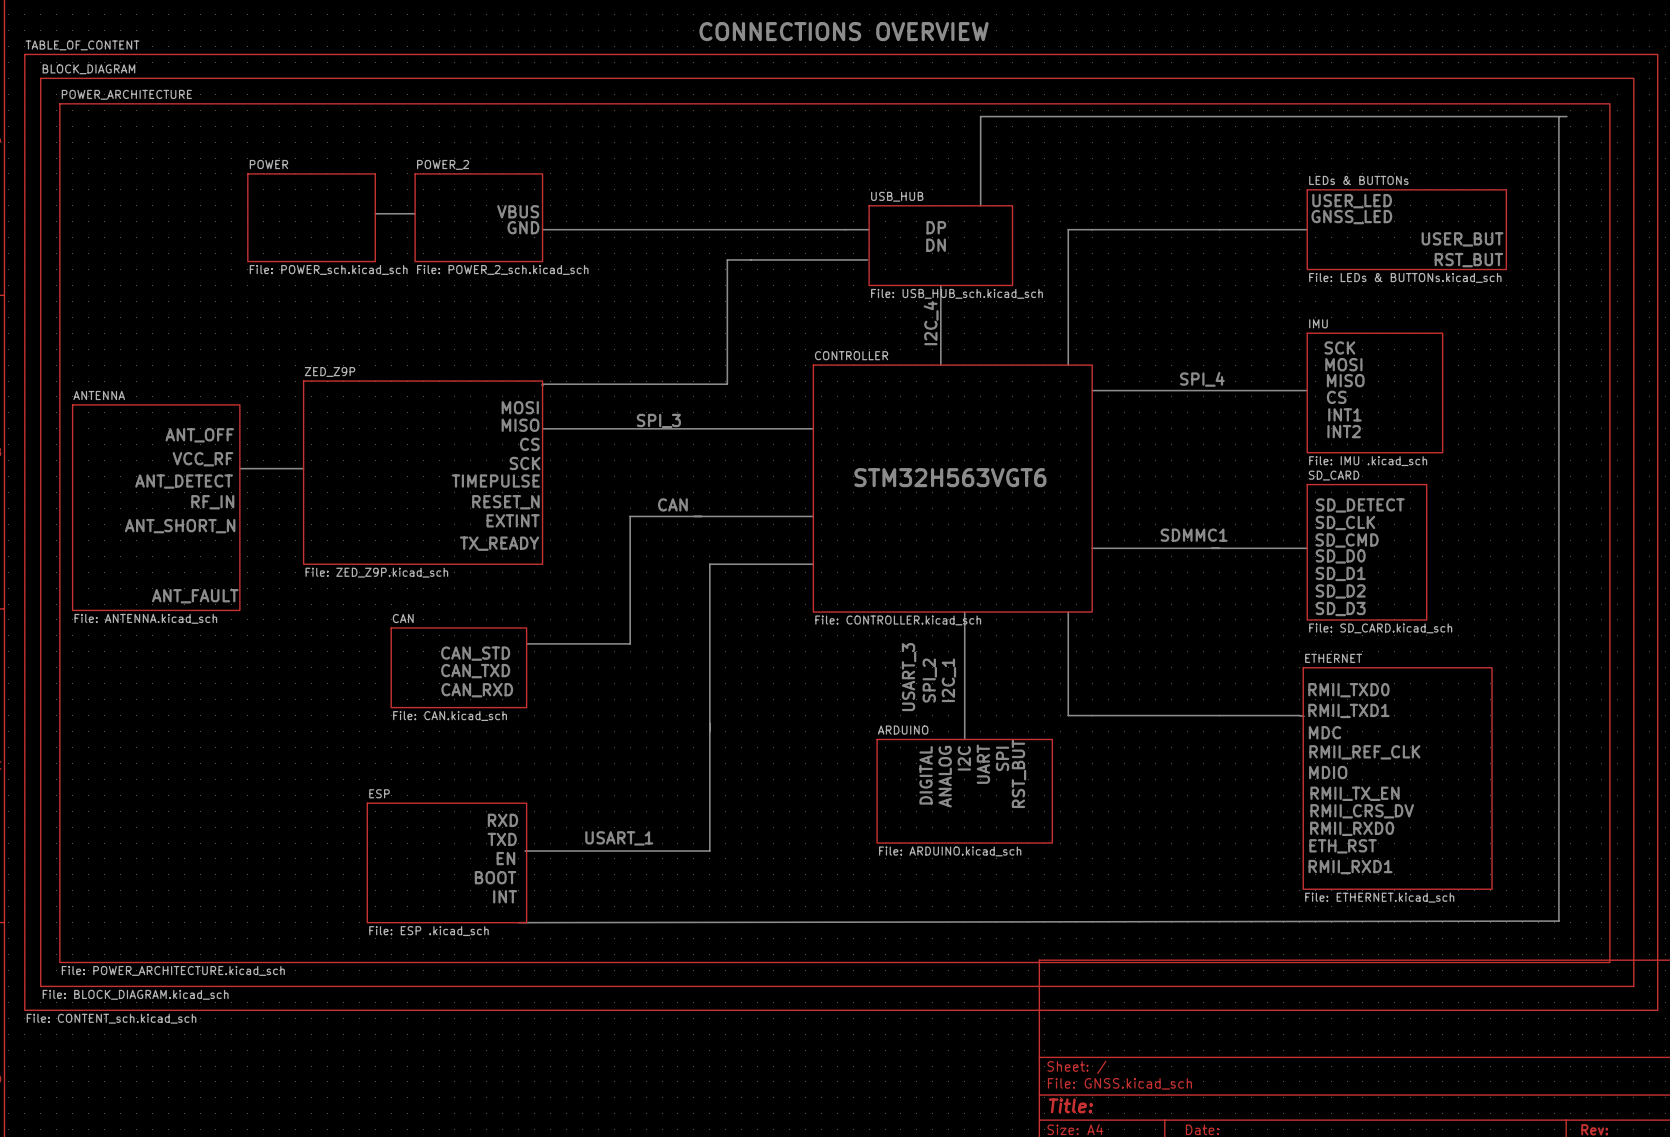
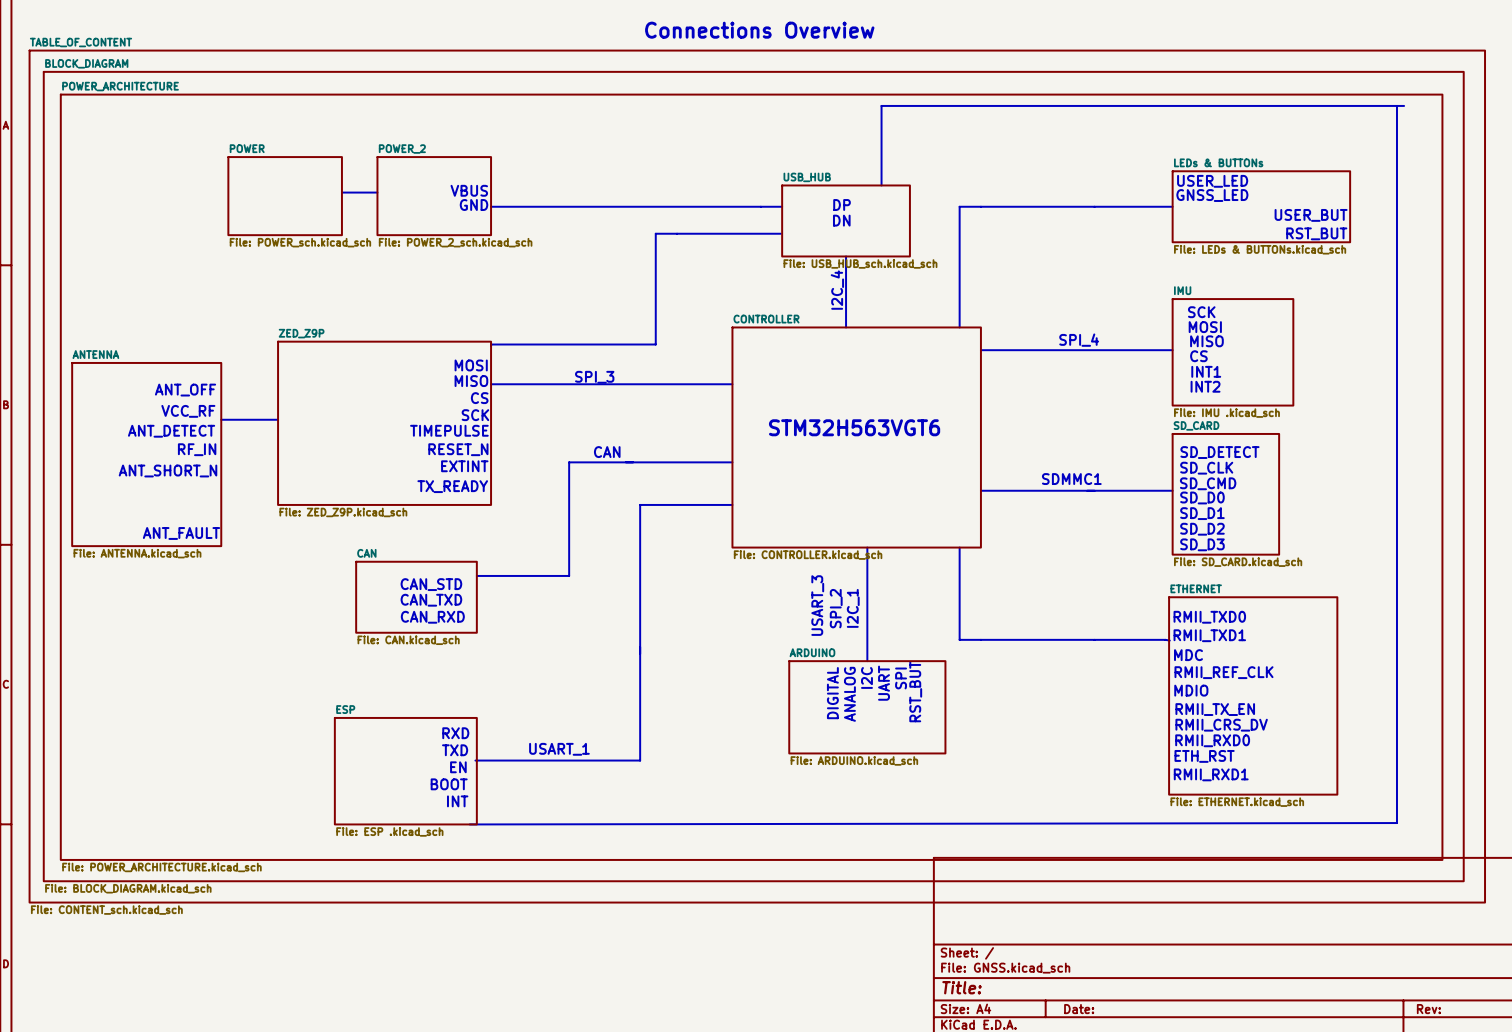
text: CONNECTIONS OVERVIEW (844, 31) -> Connections Overview (759, 30)

